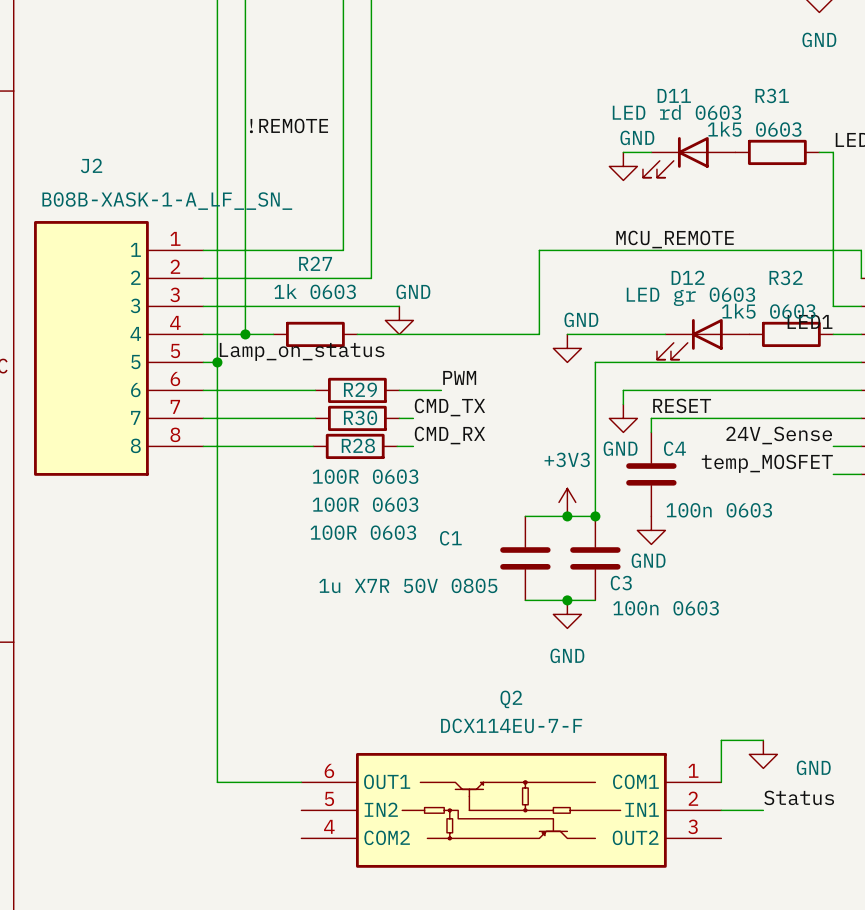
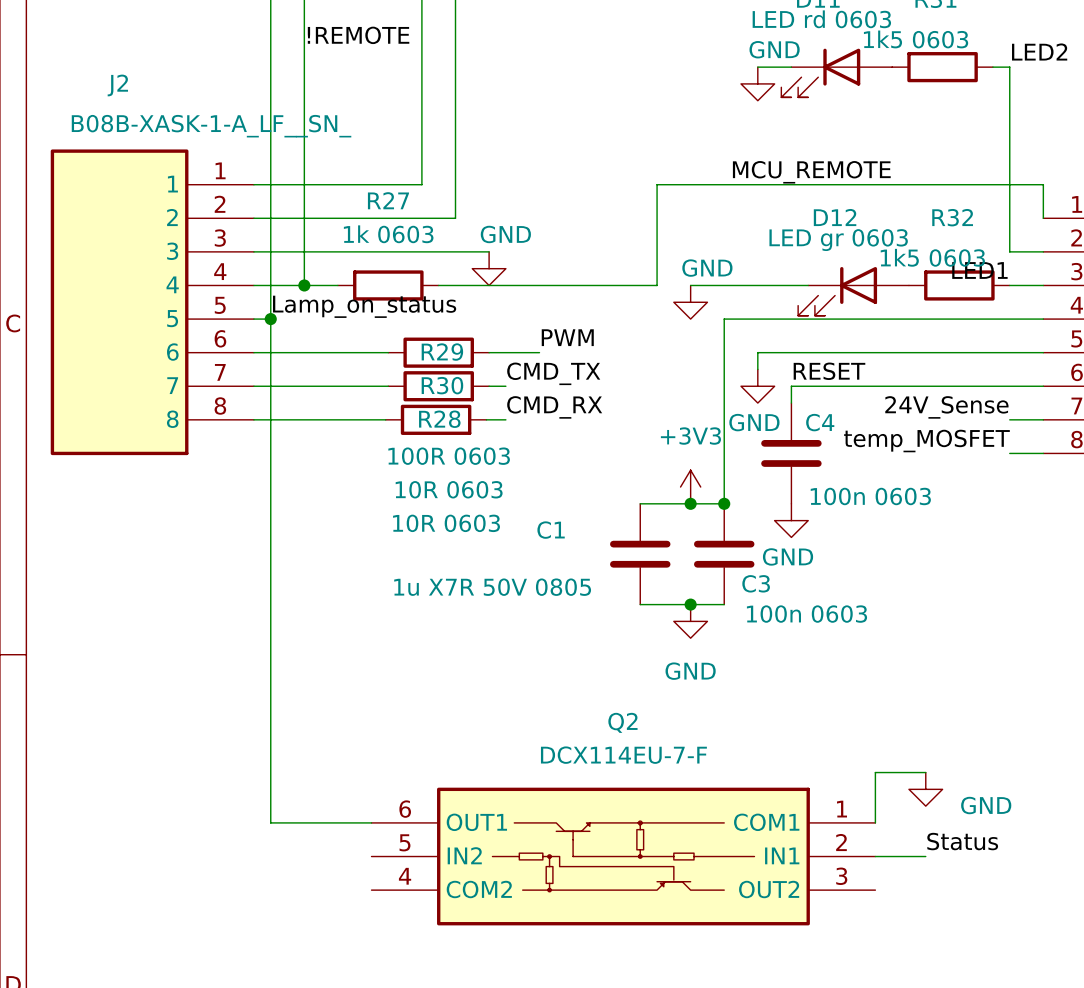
R30 value: 100R 0603 (365, 504) -> 10R 0603 (449, 489)
R28 value: 100R 0603 (363, 532) -> 10R 0603 (446, 523)

